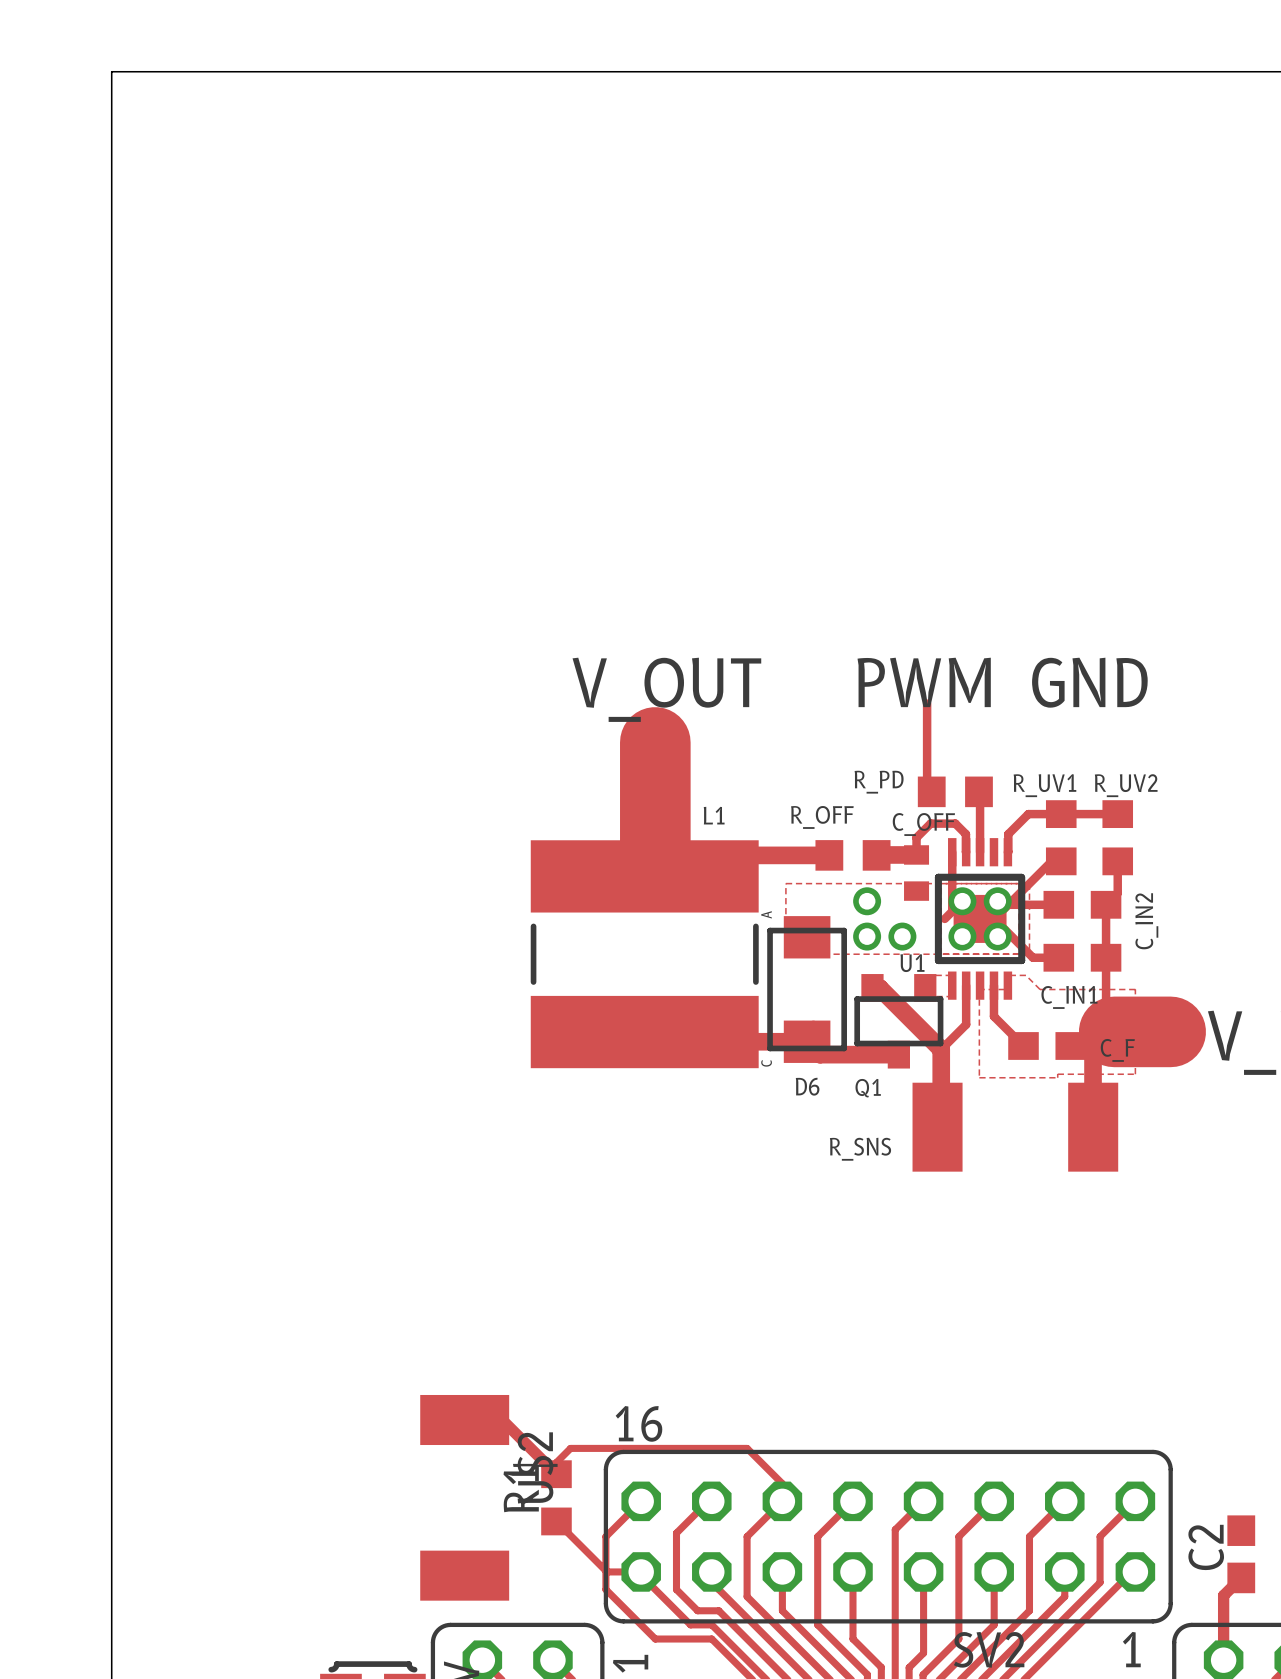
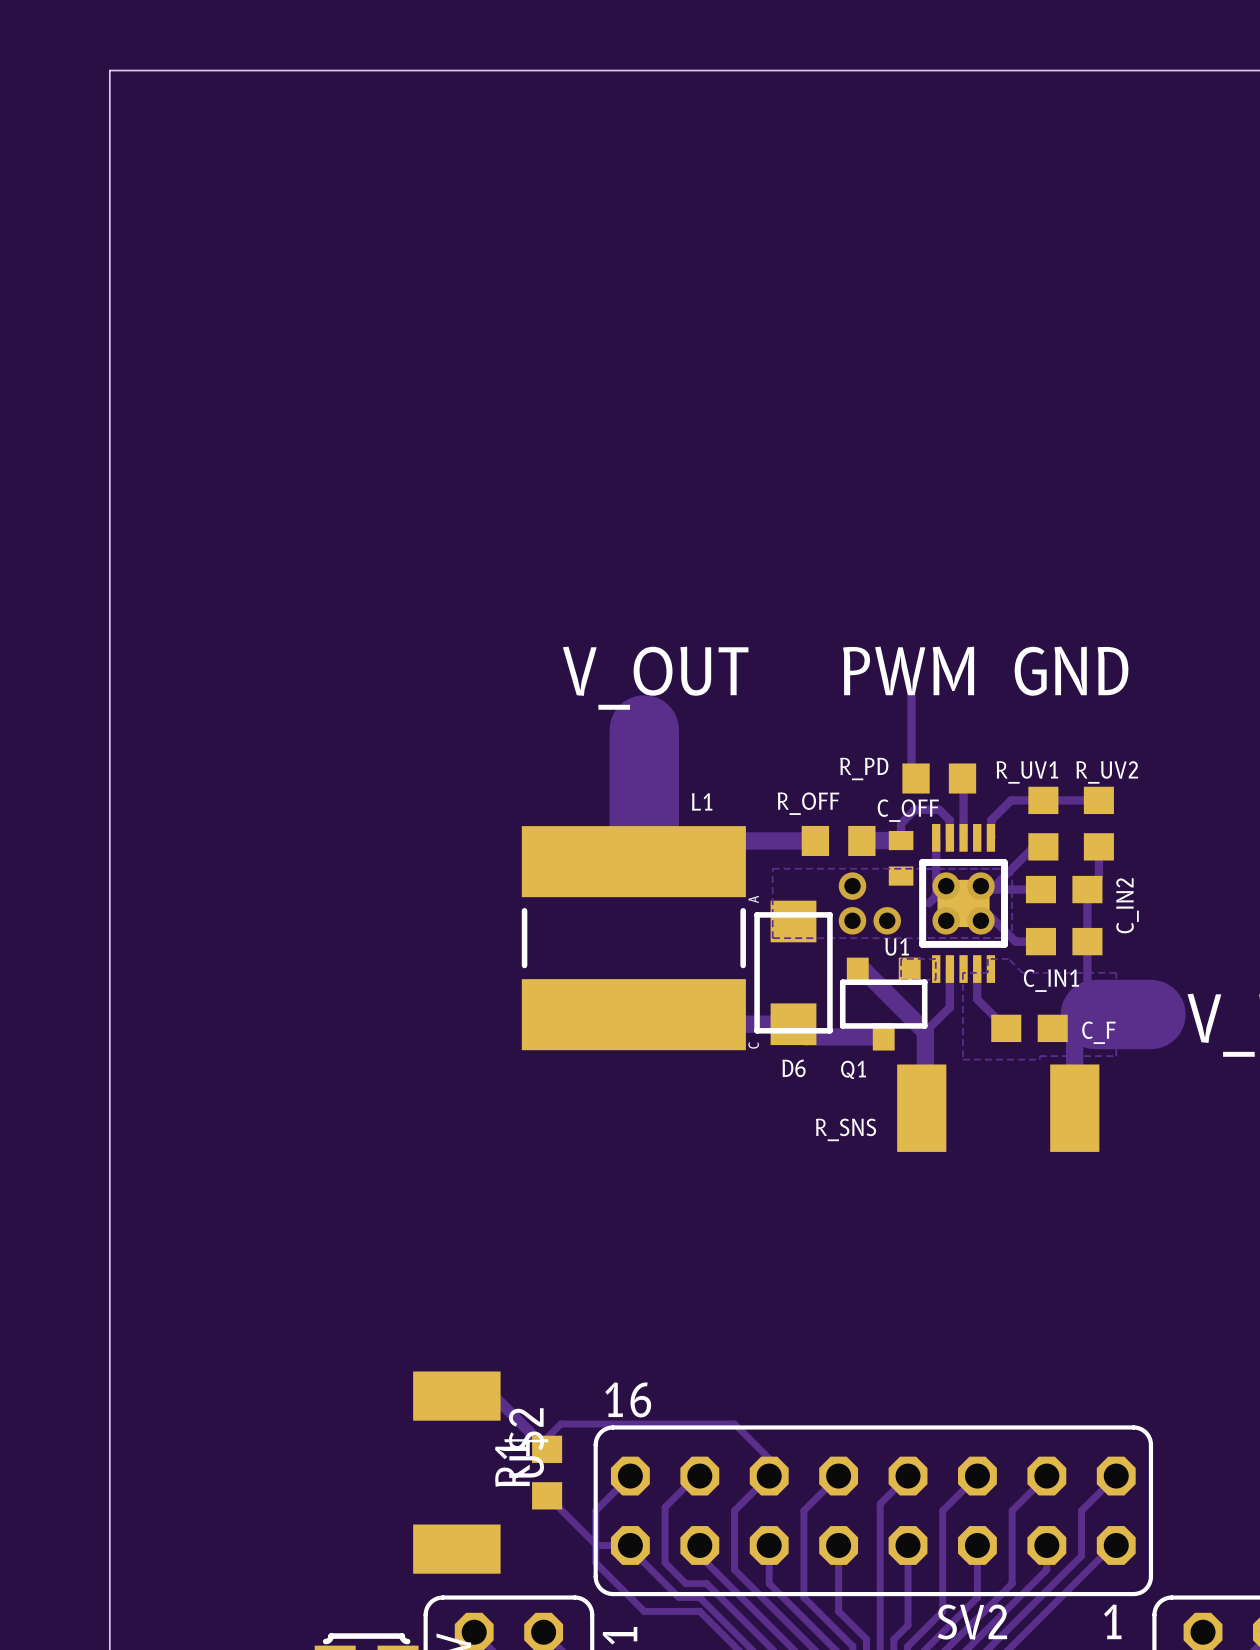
C2: (1241, 1554) -> none
track: (1241, 1577) (1223, 1595) (1223, 1660) -> none

